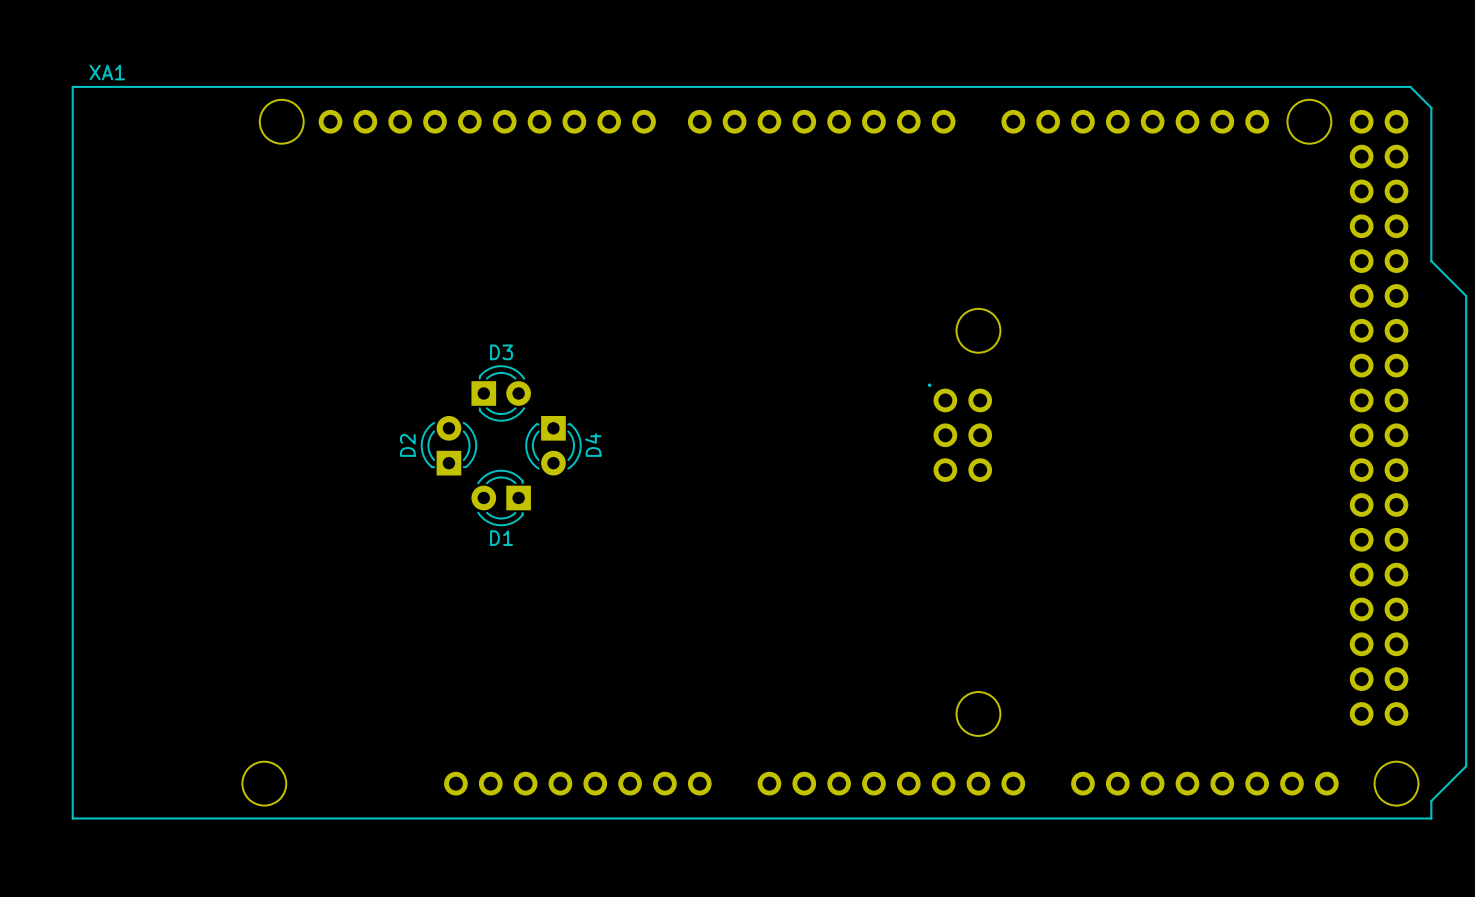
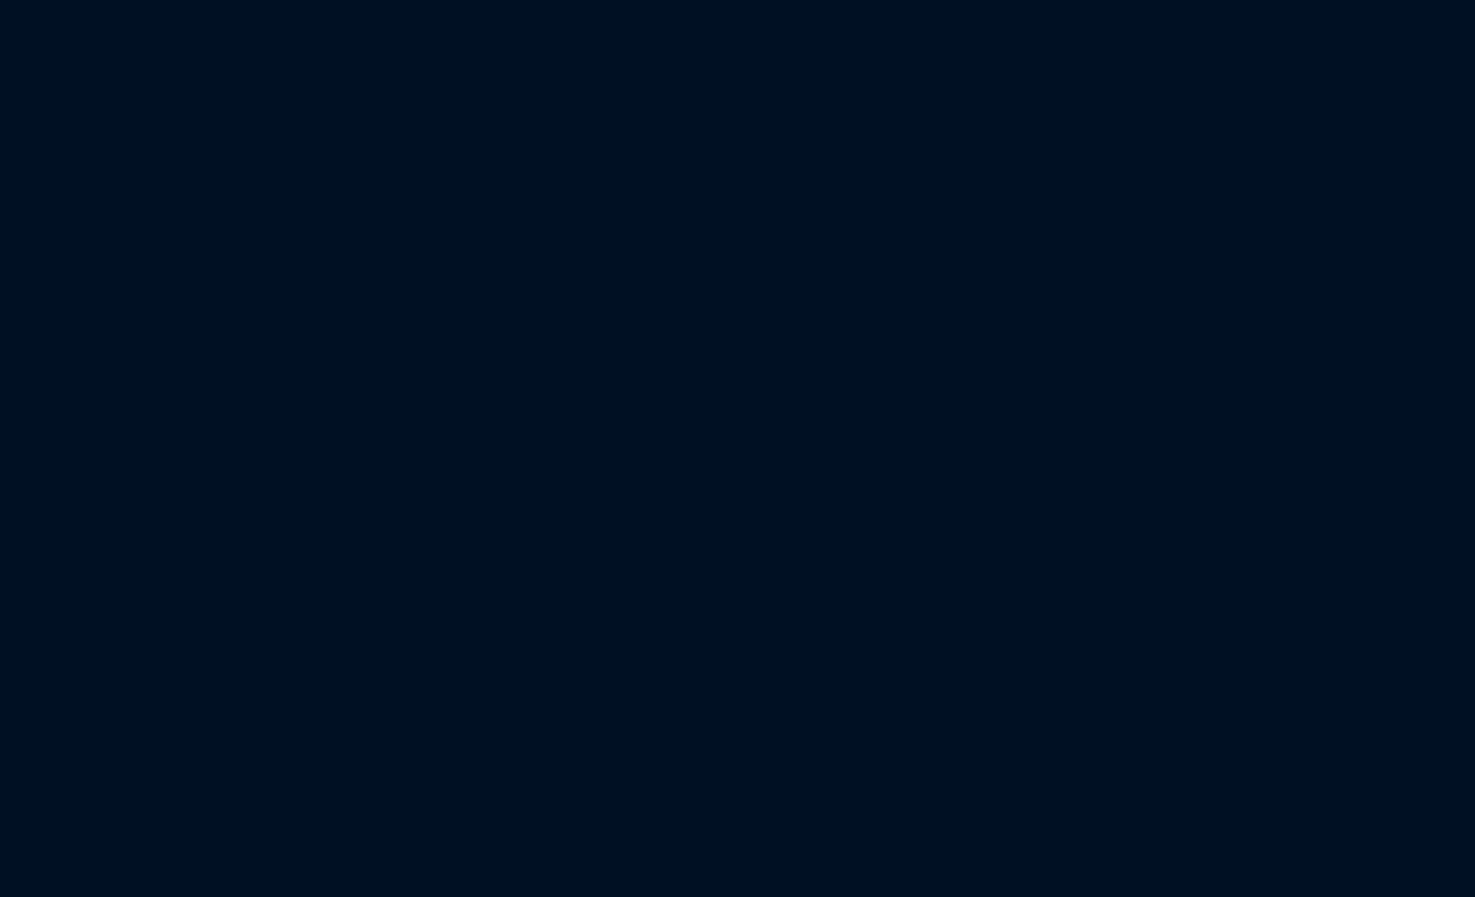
D3: (501, 393) -> none
D2: (448, 445) -> none
D4: (553, 445) -> none
XA1: (769, 452) -> none
D1: (501, 497) -> none

